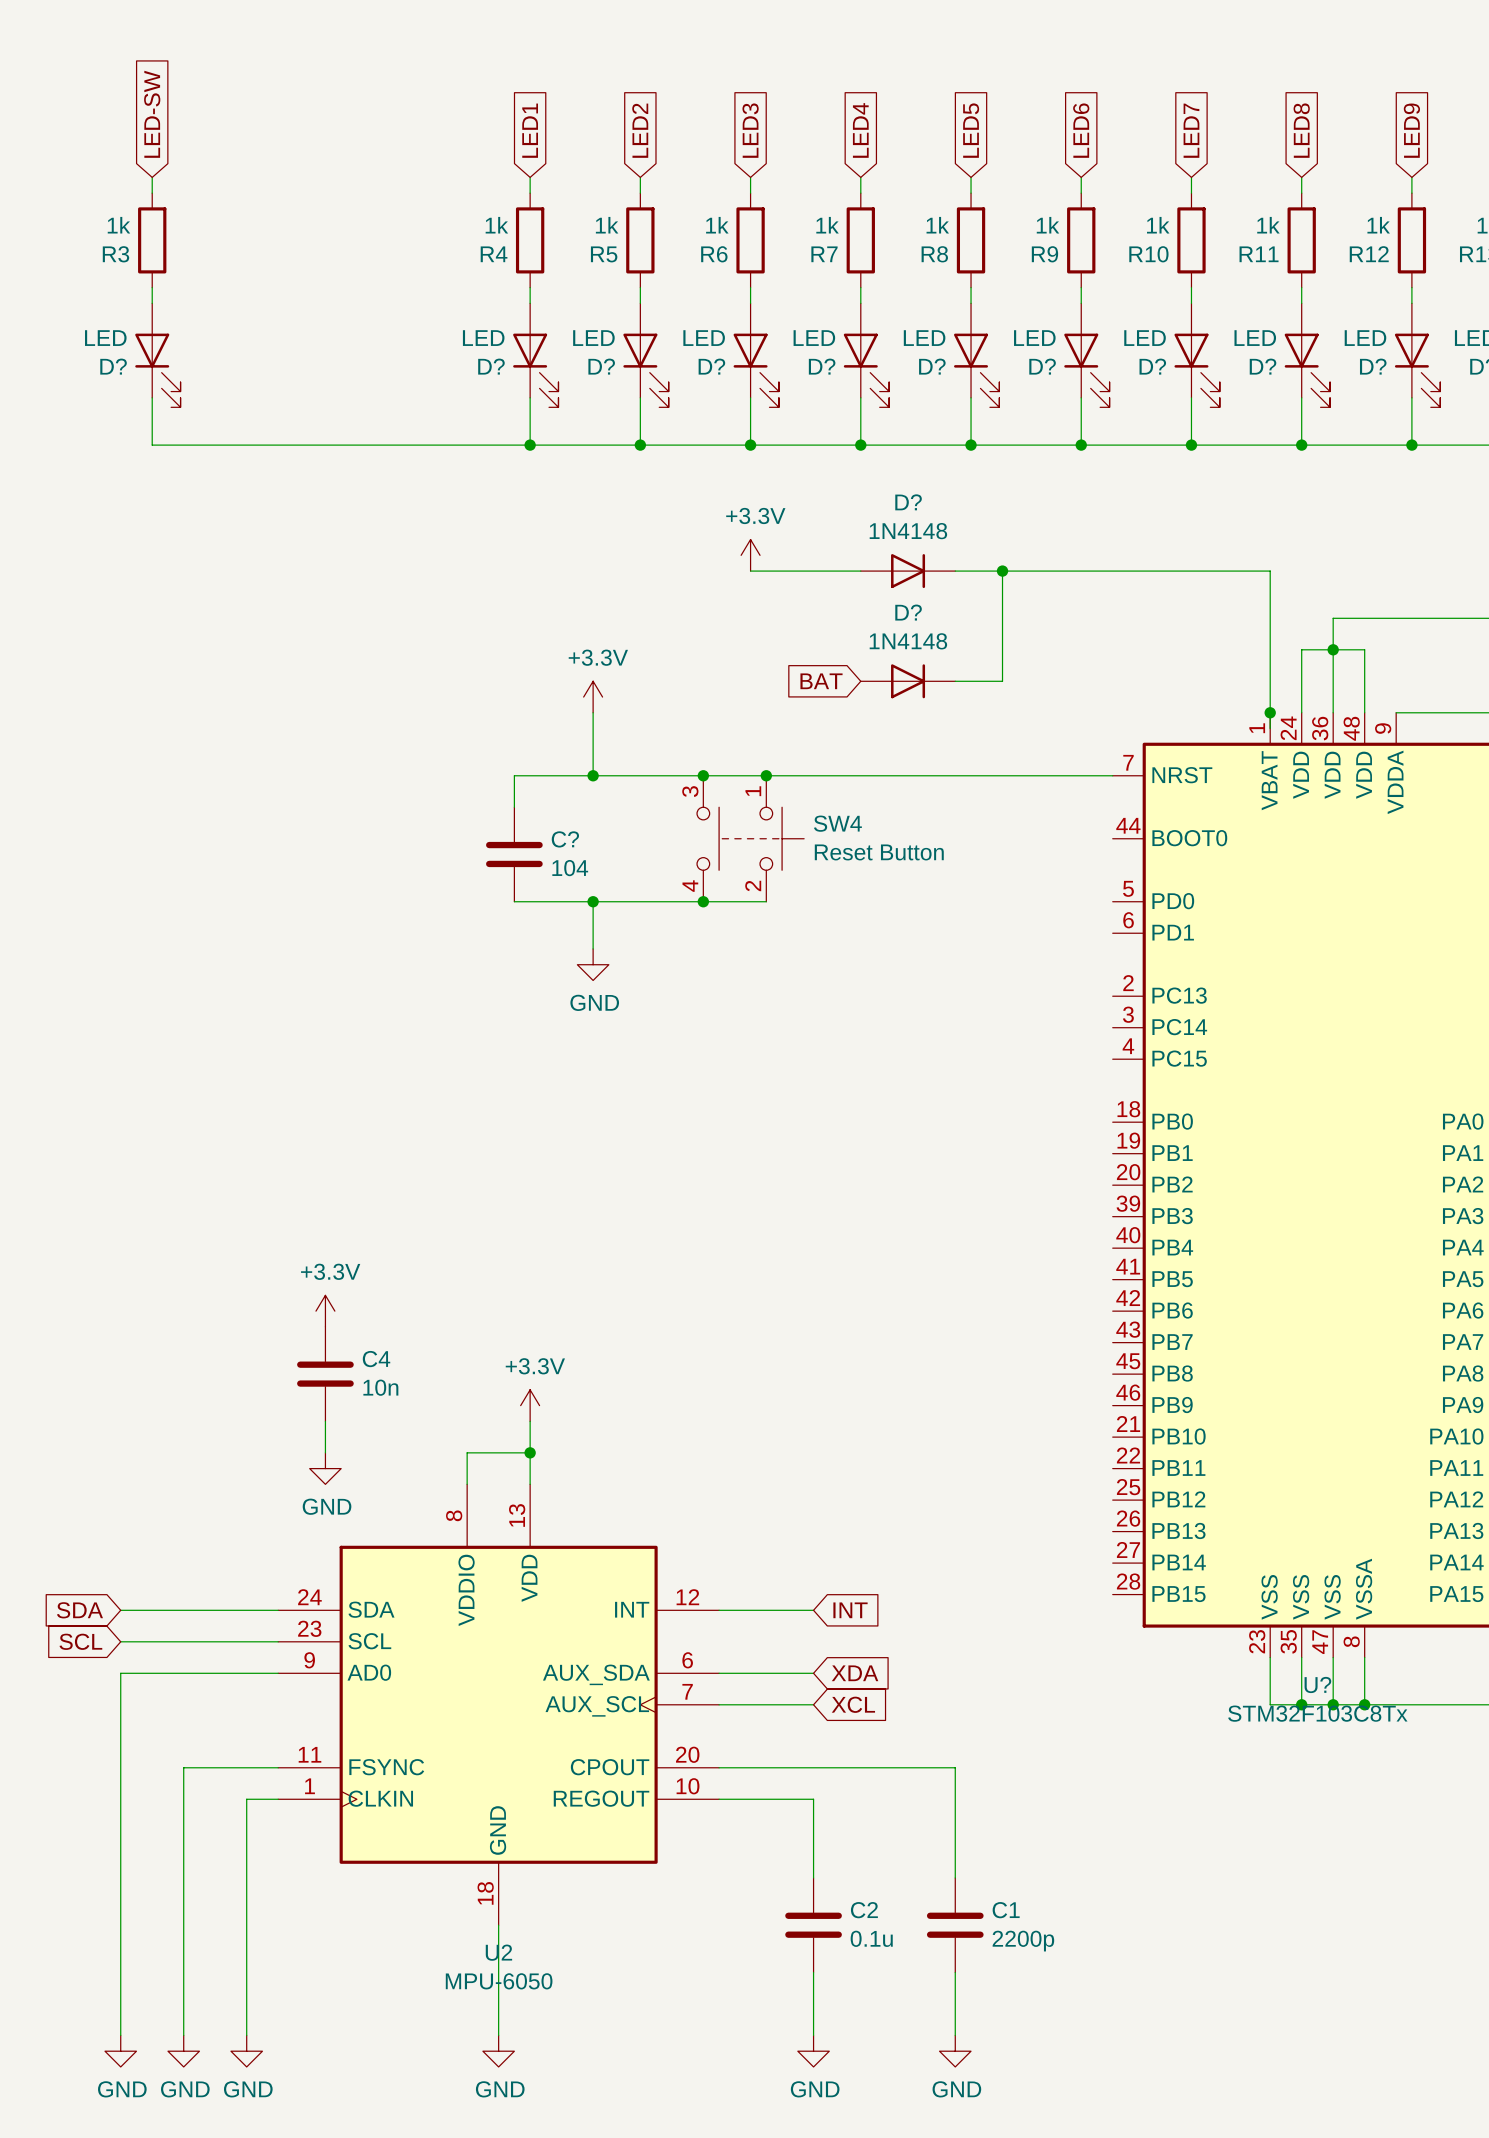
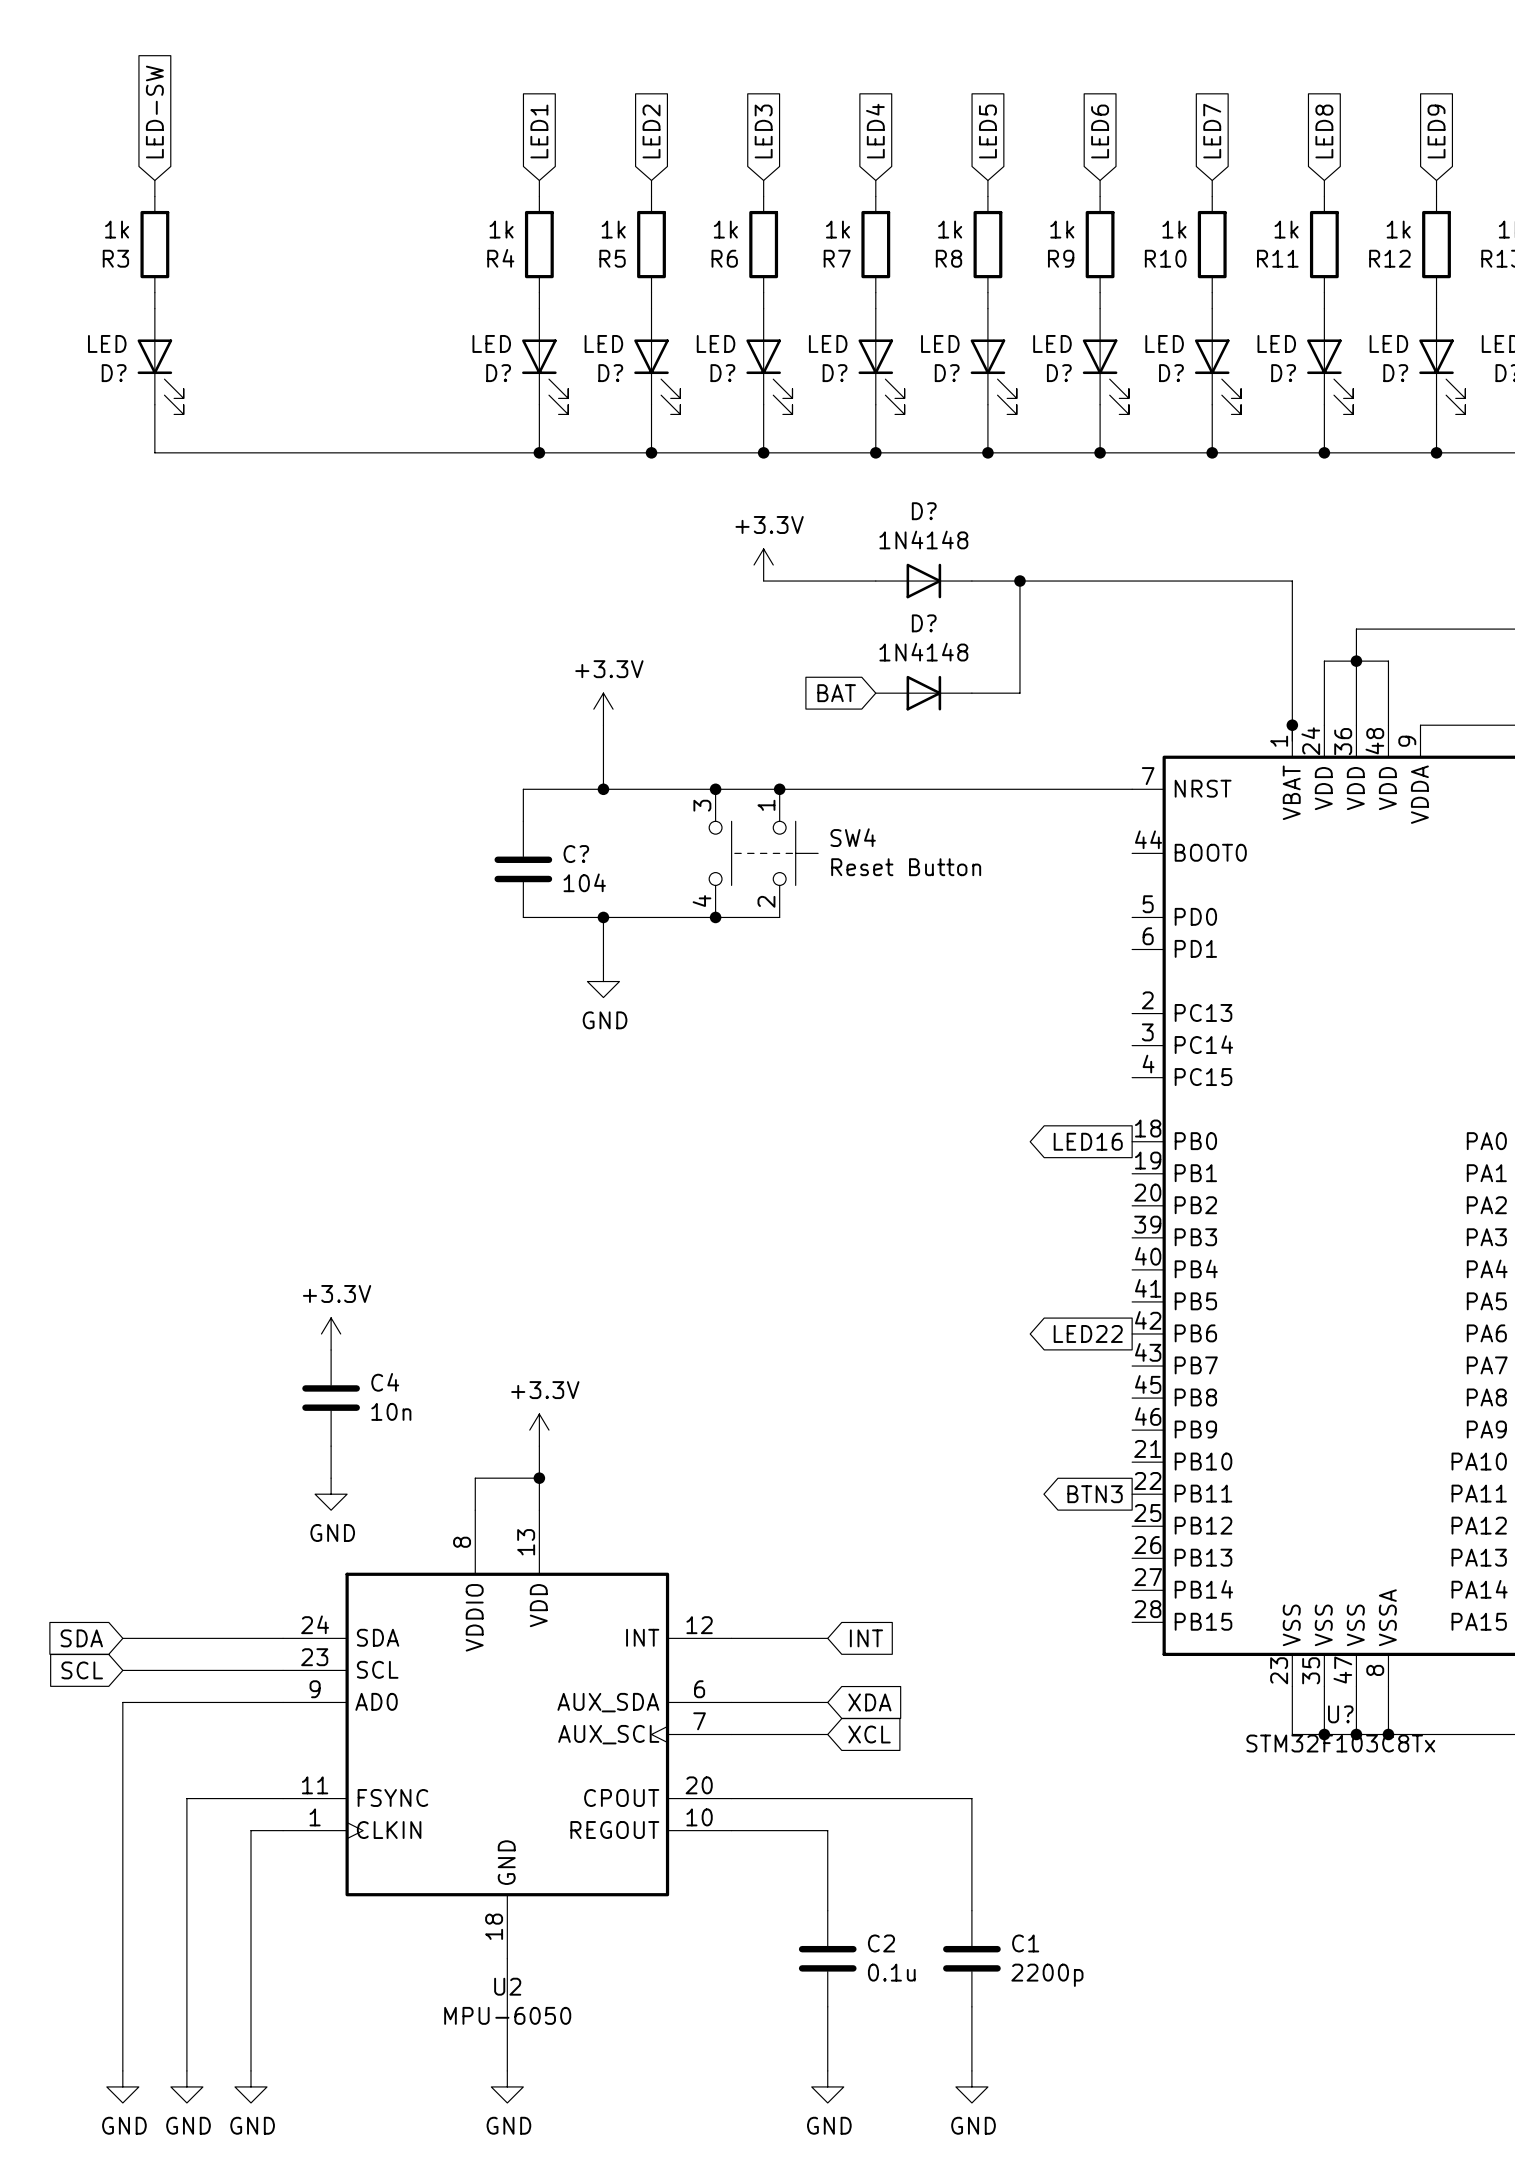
global label: none -> LED16 (1088, 1141)
global label: none -> LED22 (1088, 1333)
global label: none -> BTN3 (1095, 1494)

